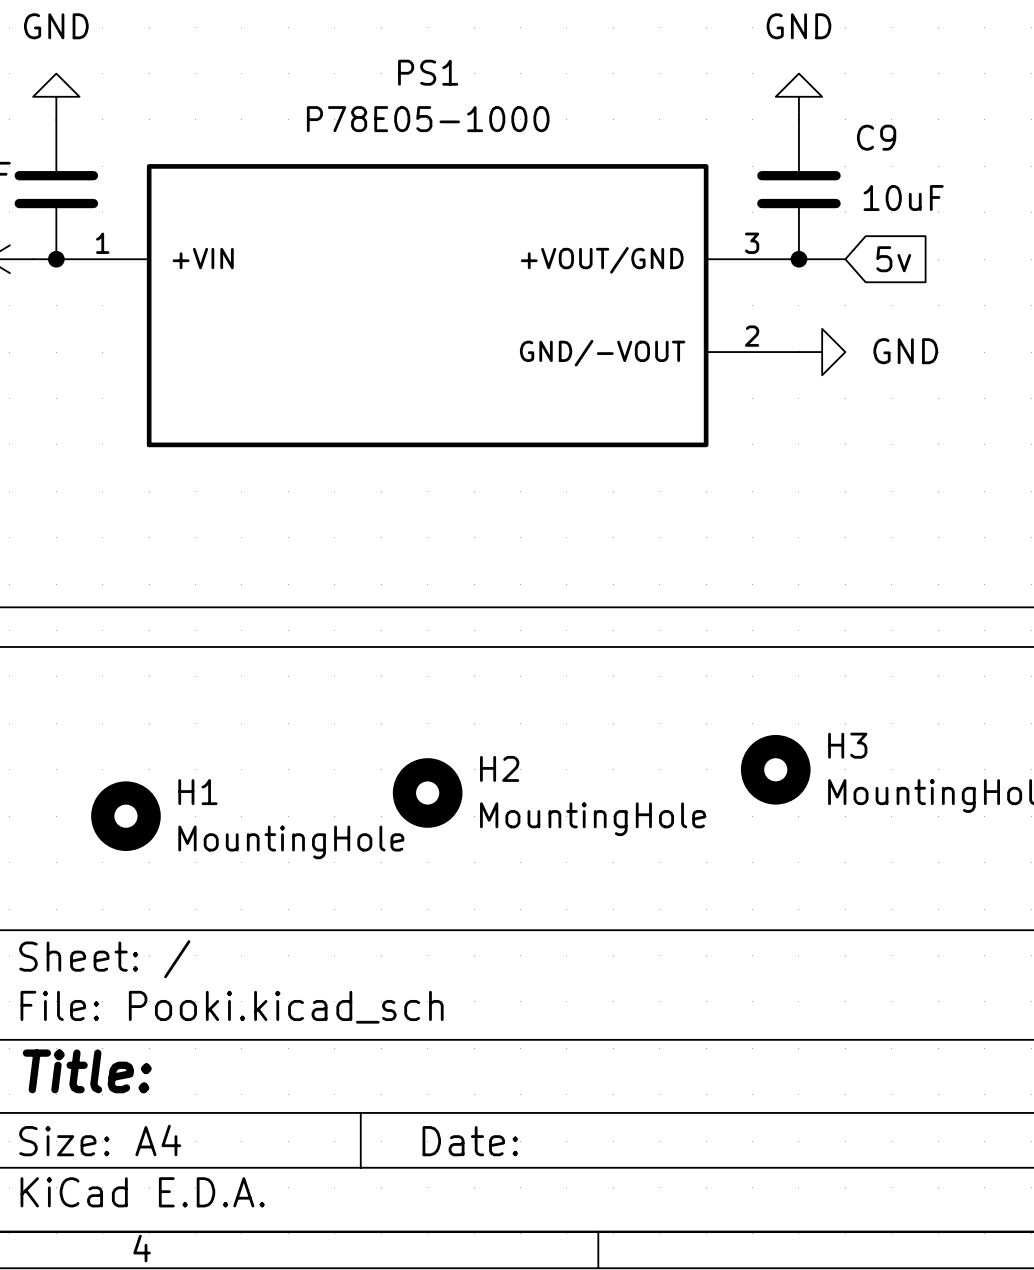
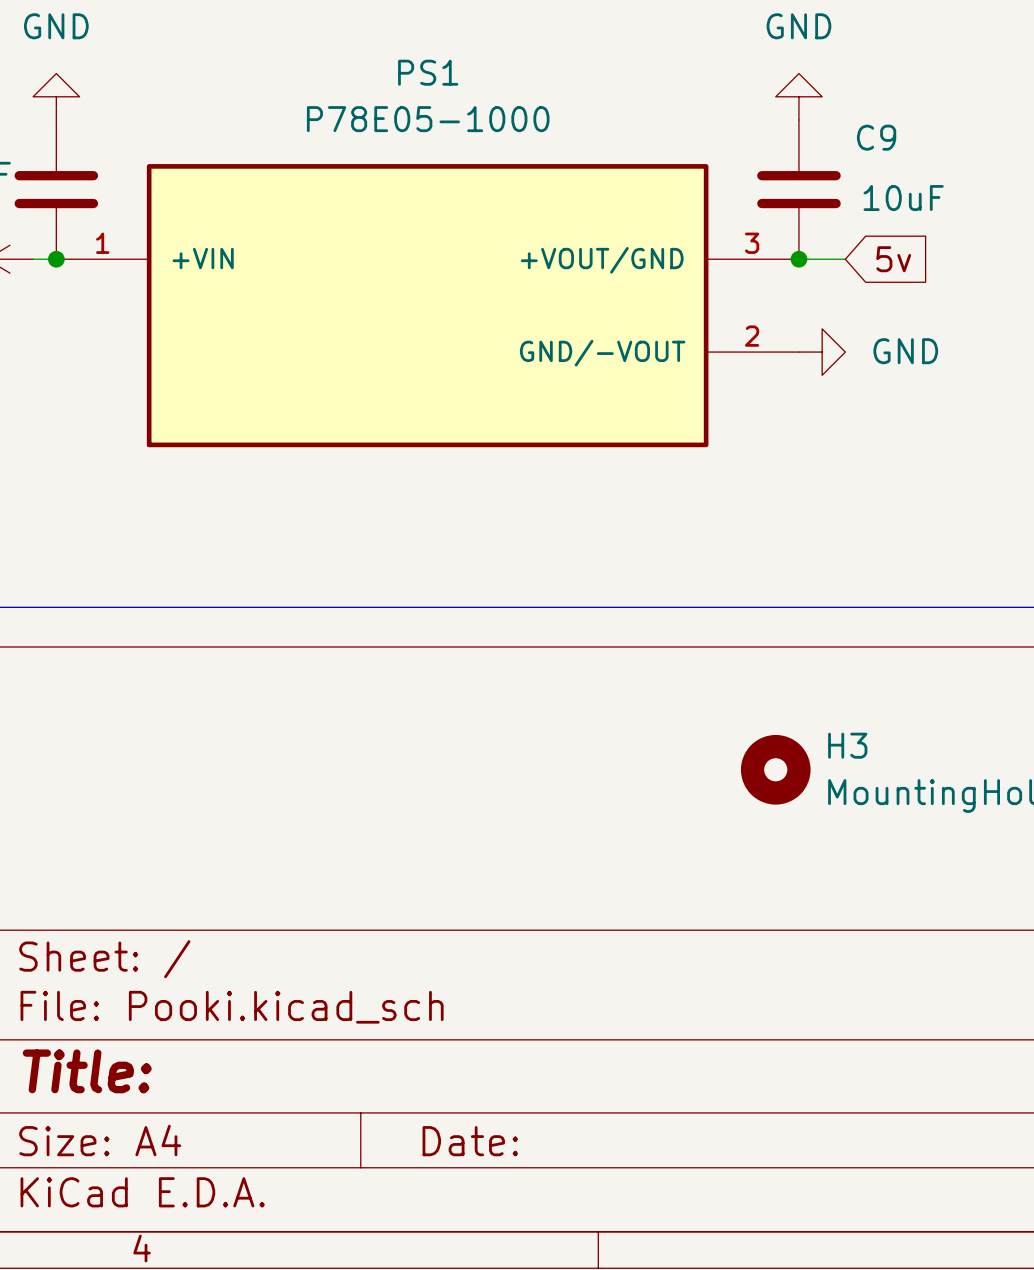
H2: MountingHole (427, 792) -> none
H1: MountingHole (125, 816) -> none

